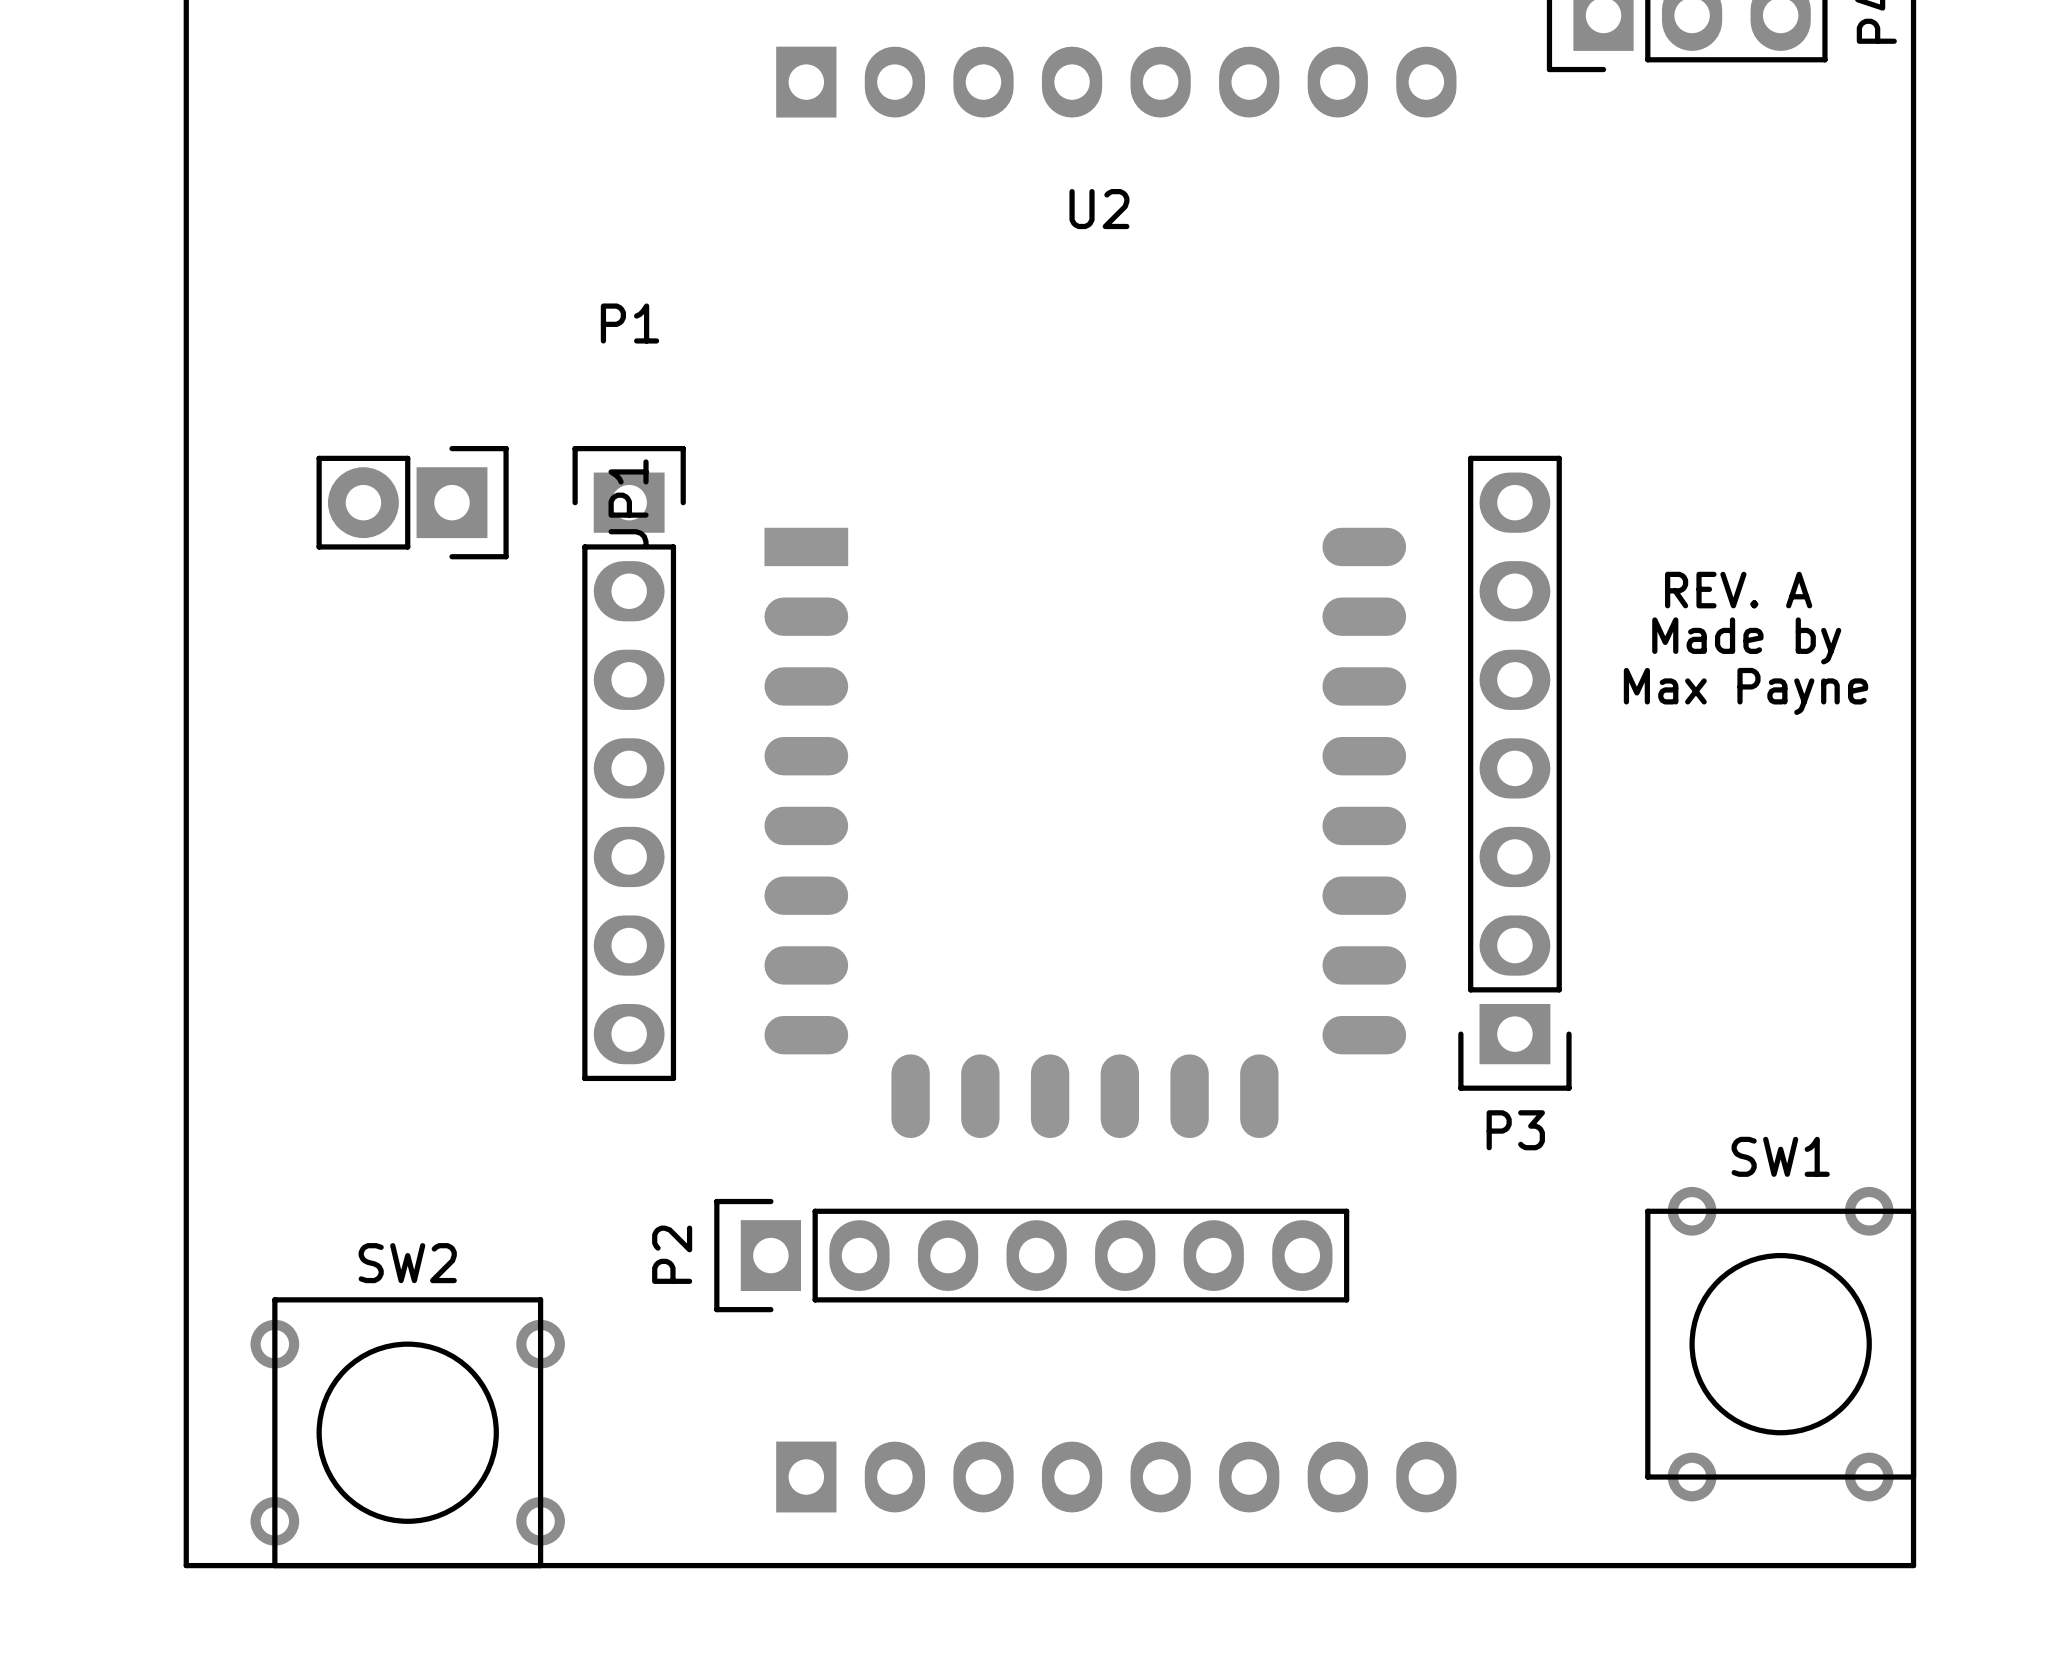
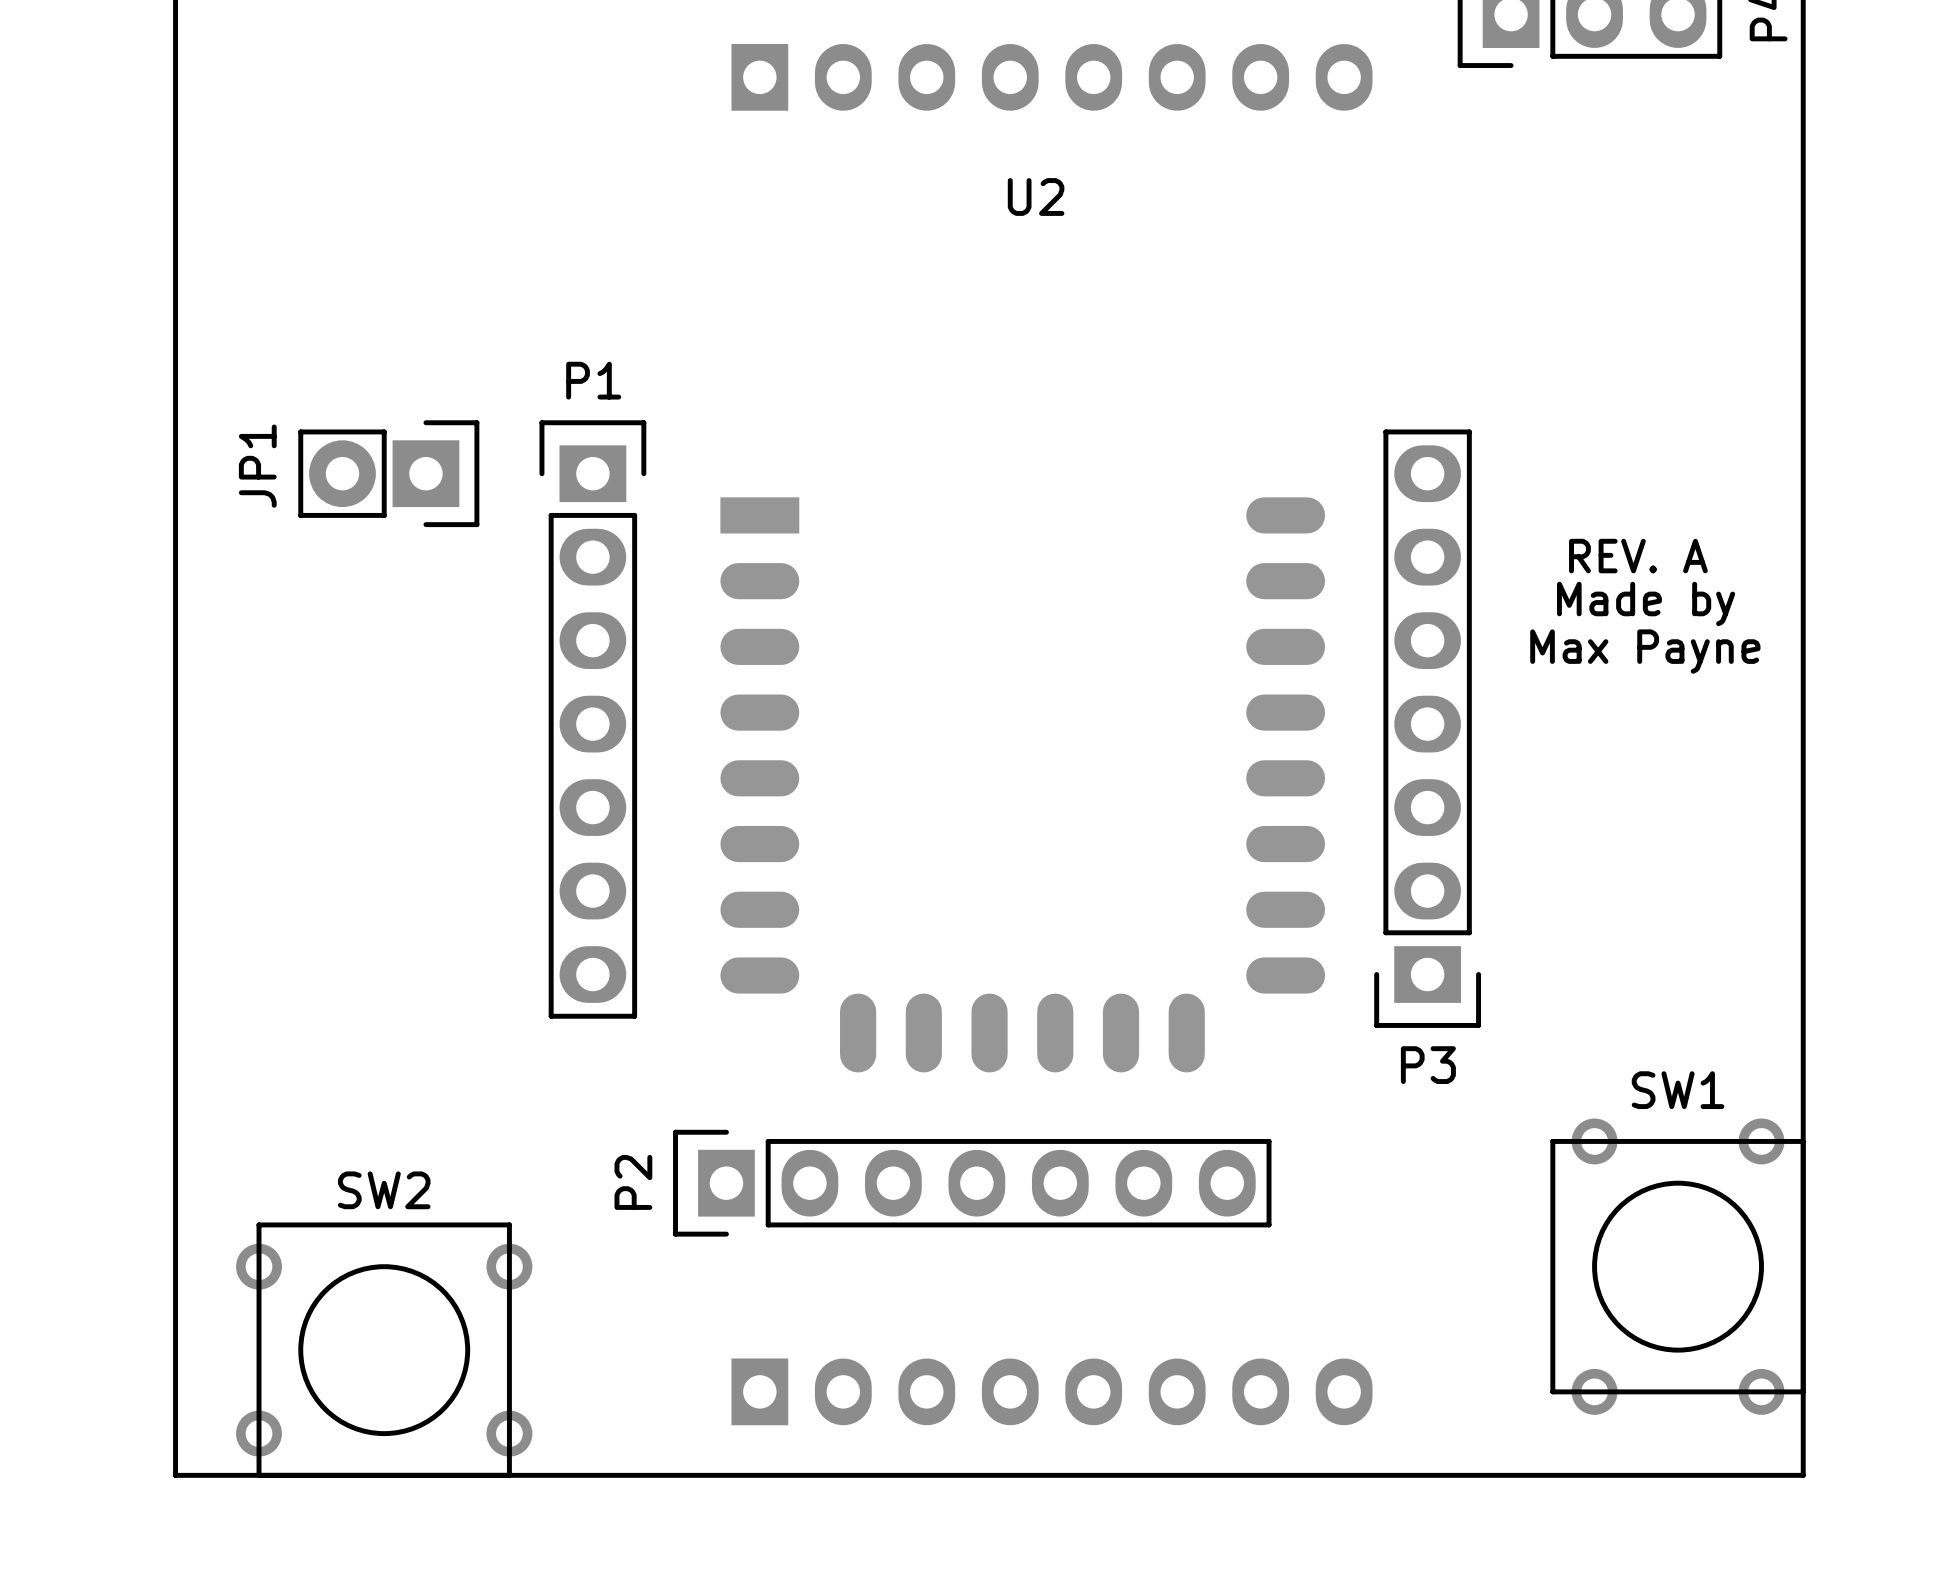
P1 name position: P1 (629, 323) -> P1 (593, 380)
JP1 name position: JP1 (628, 503) -> JP1 (257, 466)

